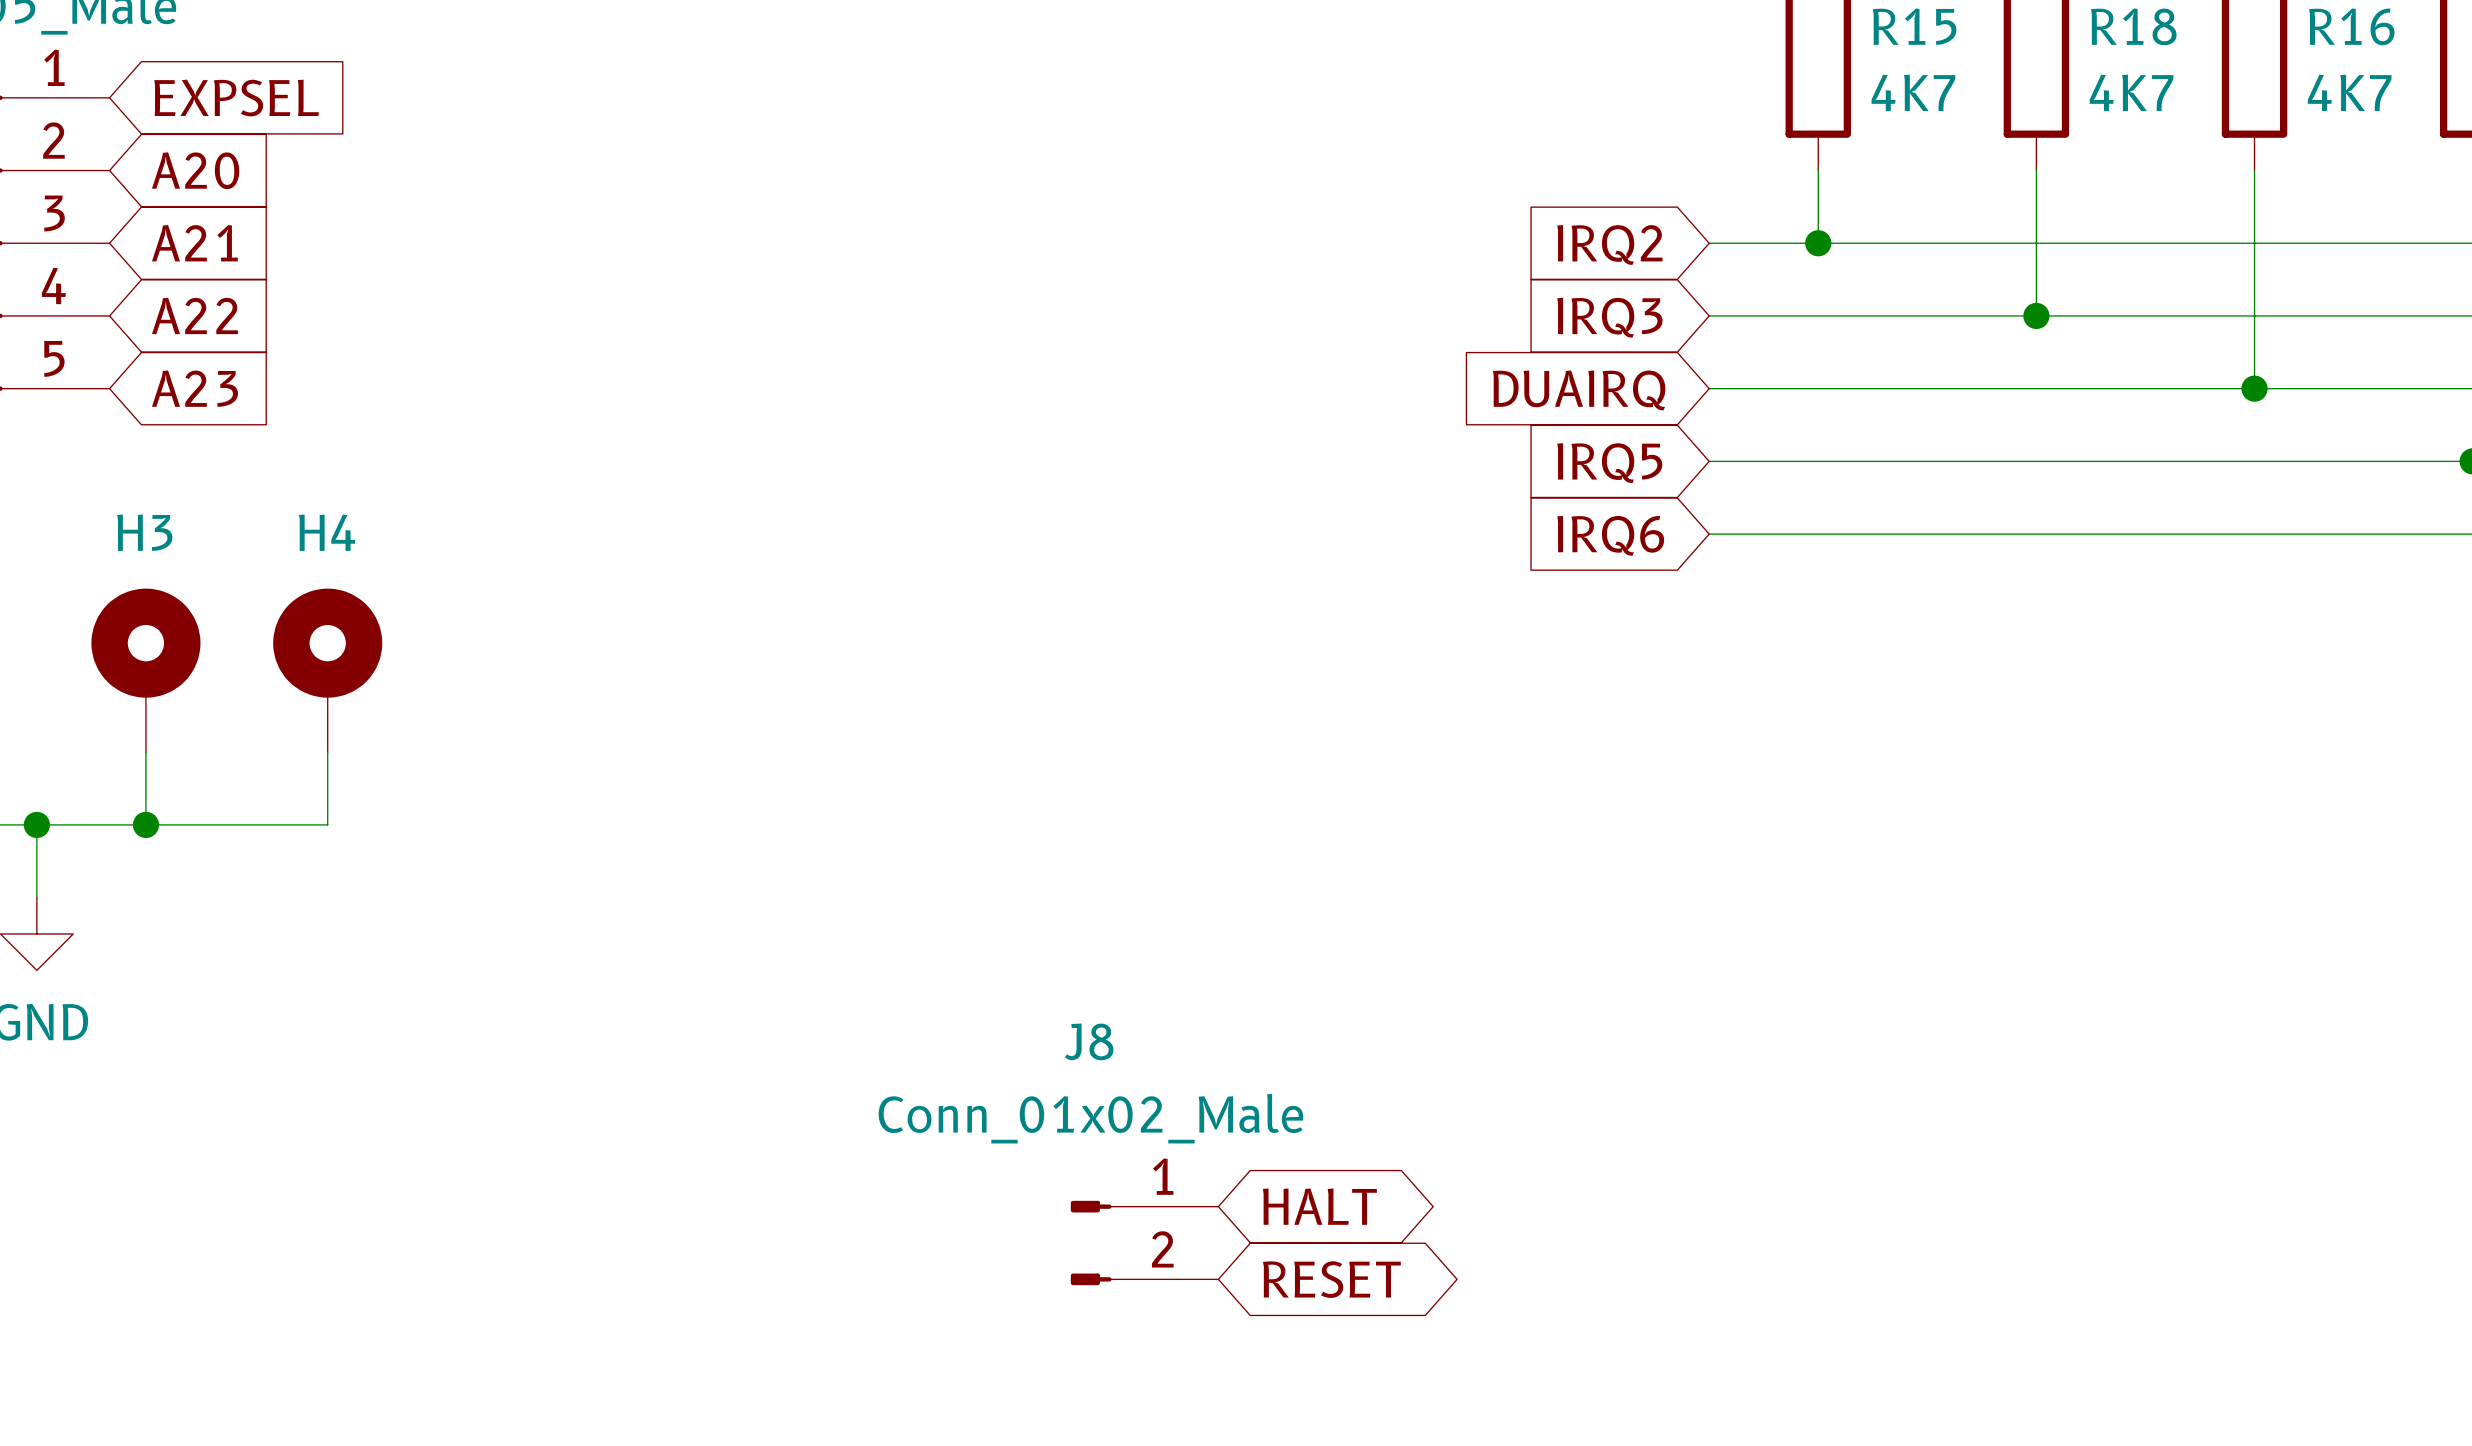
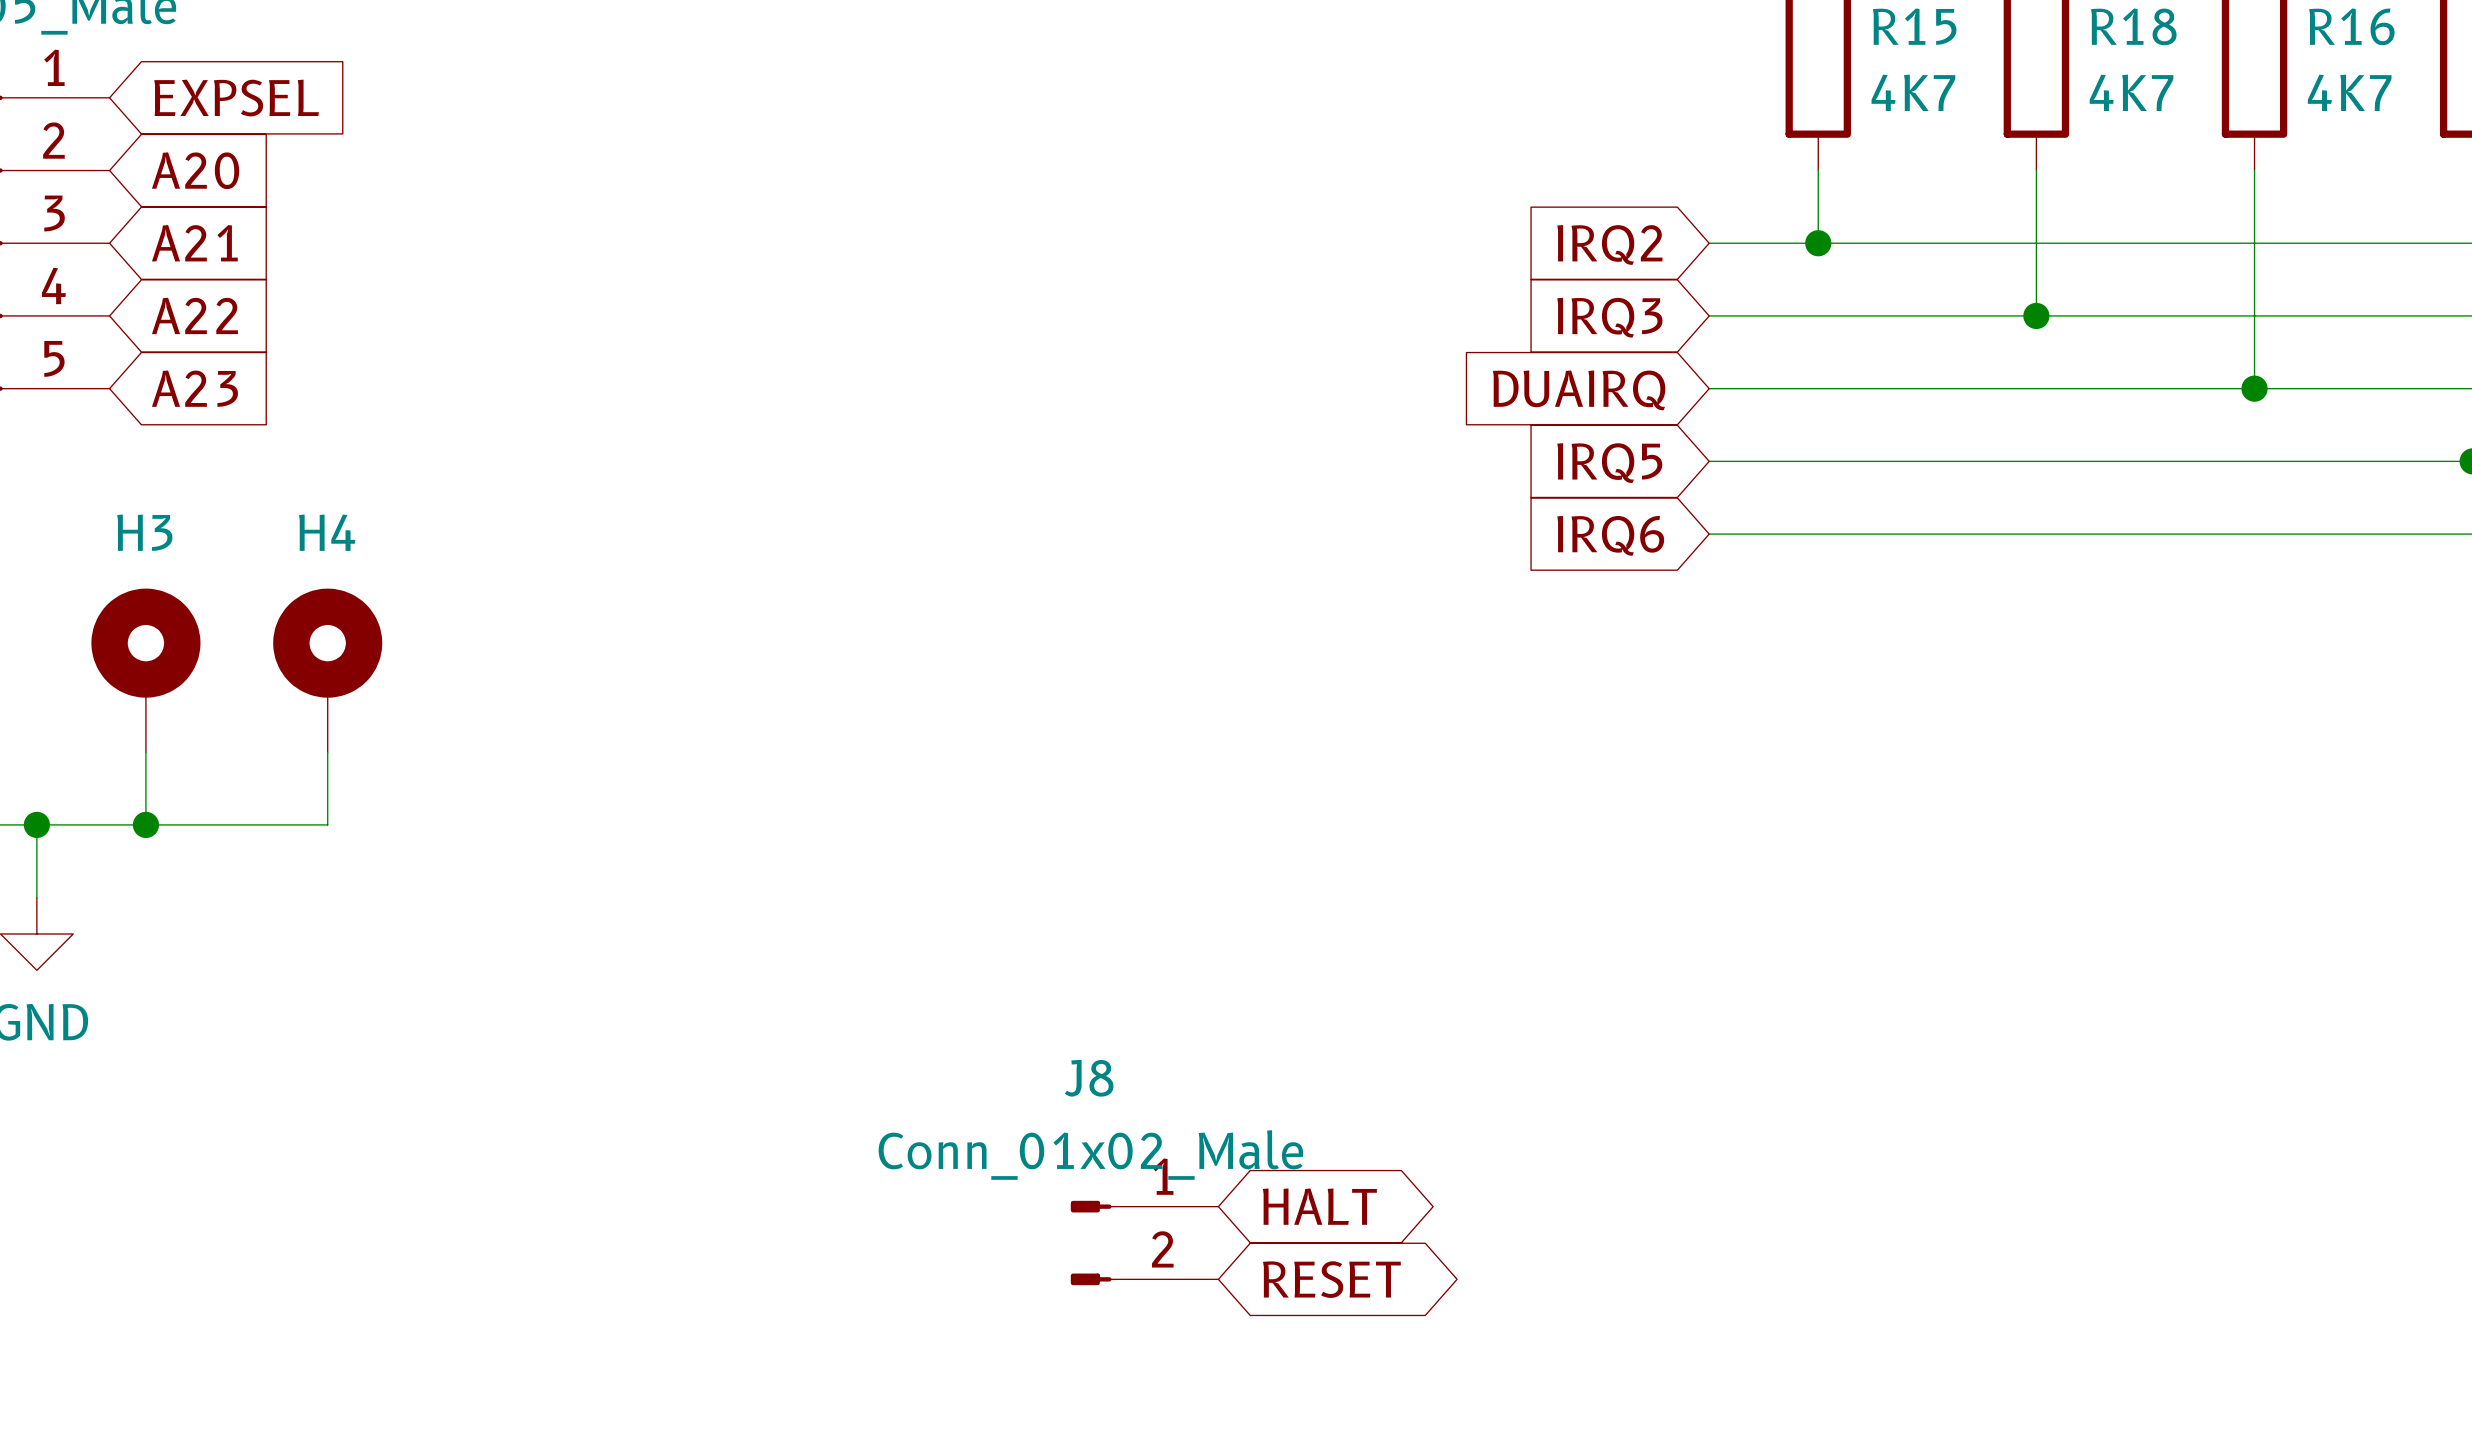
J8 name position: J8 (1089, 1041) -> J8 (1089, 1078)
J8 value position: Conn_01x02_Male (1090, 1118) -> Conn_01x02_Male (1090, 1155)

